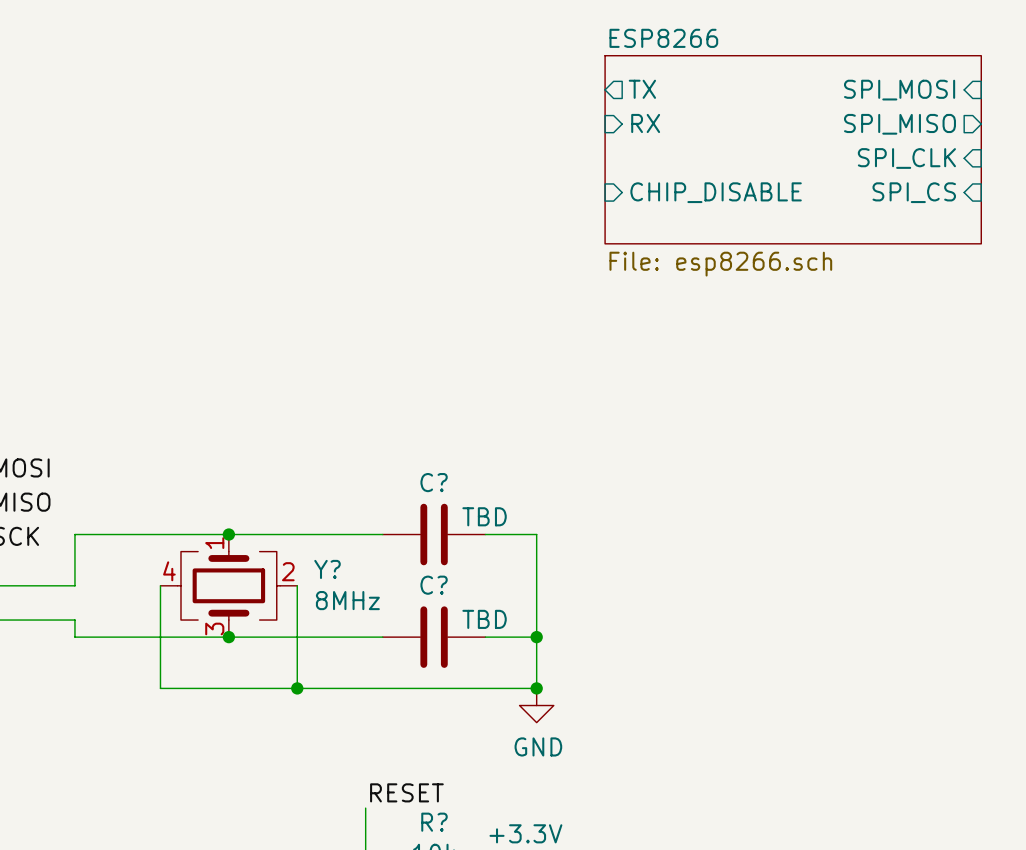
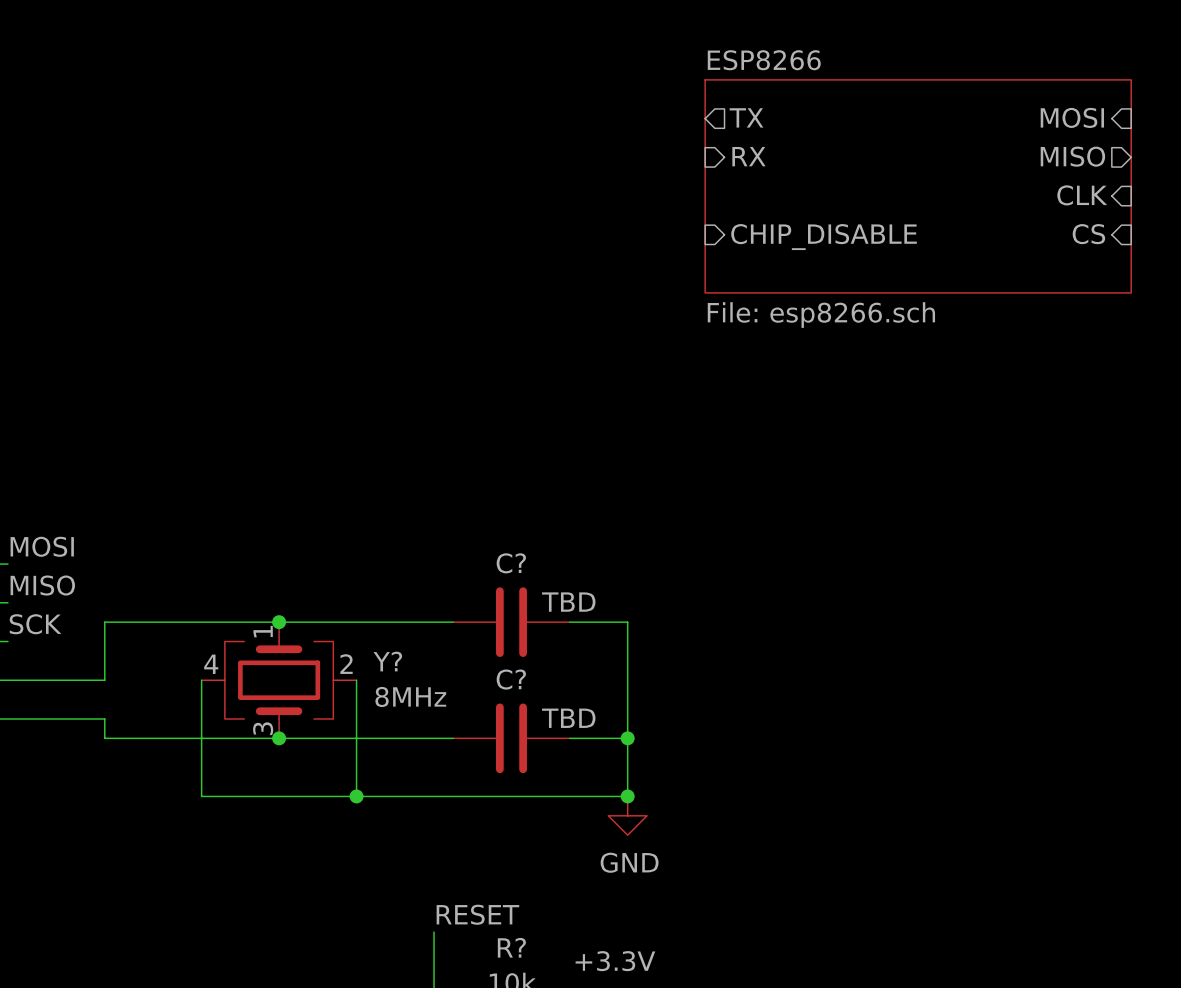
sheet pin: SPI_MOSI (899, 90) -> MOSI (1072, 117)
sheet pin: SPI_MISO (899, 124) -> MISO (1072, 156)
sheet pin: SPI_CLK (906, 158) -> CLK (1082, 195)
sheet pin: SPI_CS (914, 192) -> CS (1088, 234)

